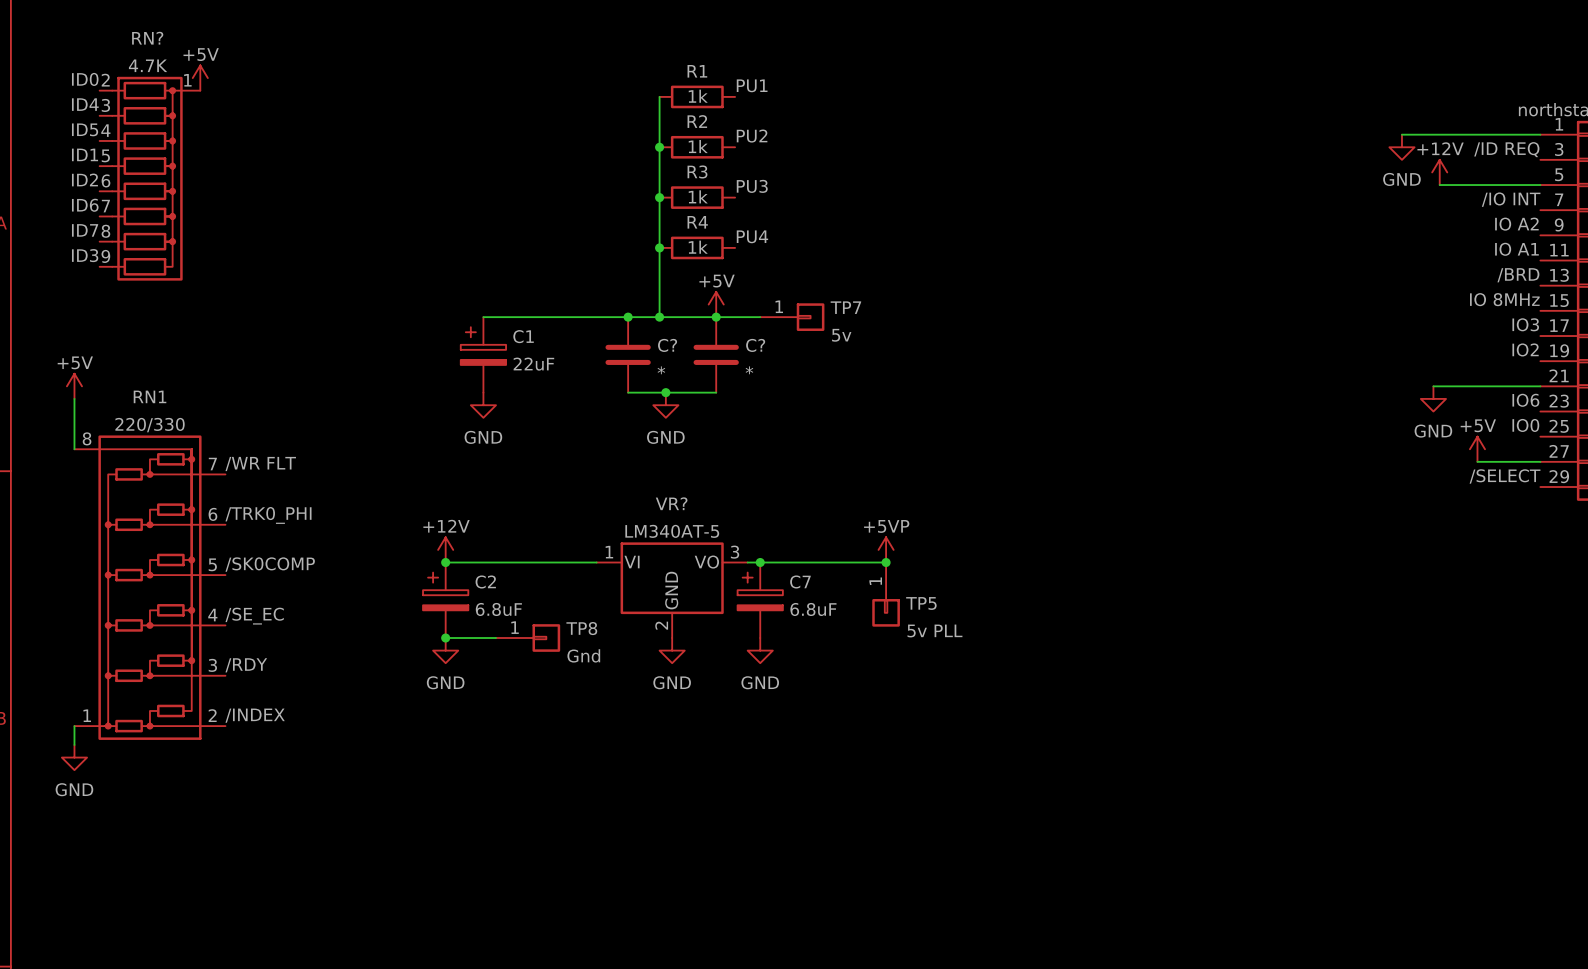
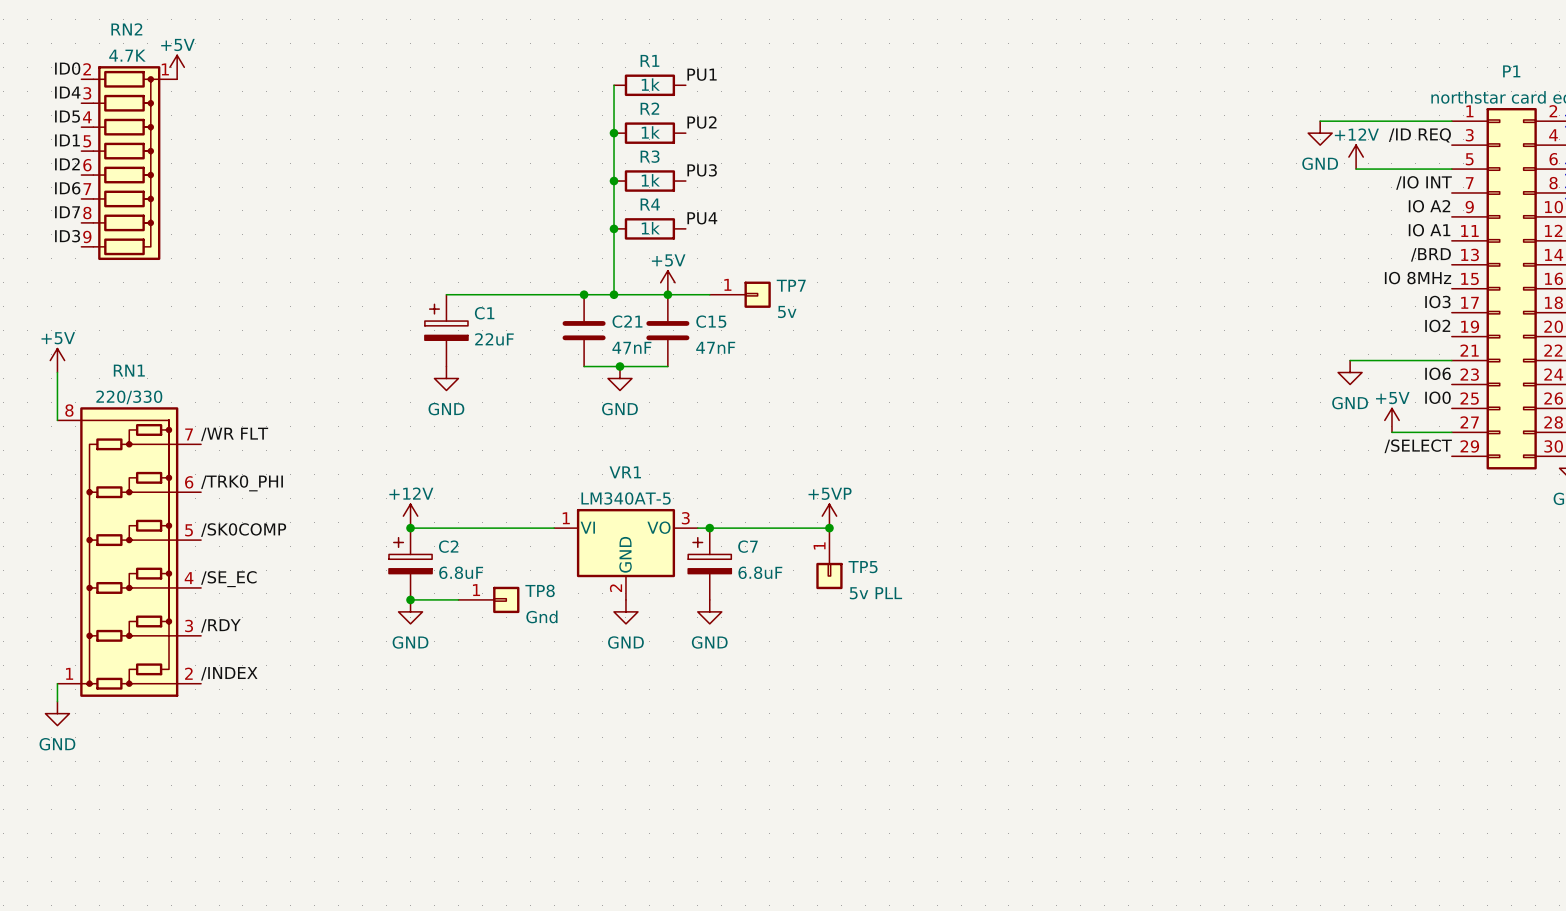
RN? name: RN? (147, 38) -> RN2 (126, 29)
C? name: C? (667, 345) -> C21 (627, 321)
C? name: C? (755, 345) -> C15 (711, 321)
C? value: * (661, 370) -> 47nF (631, 347)
C? value: * (749, 370) -> 47nF (715, 347)
VR? name: VR? (671, 503) -> VR1 (625, 472)

